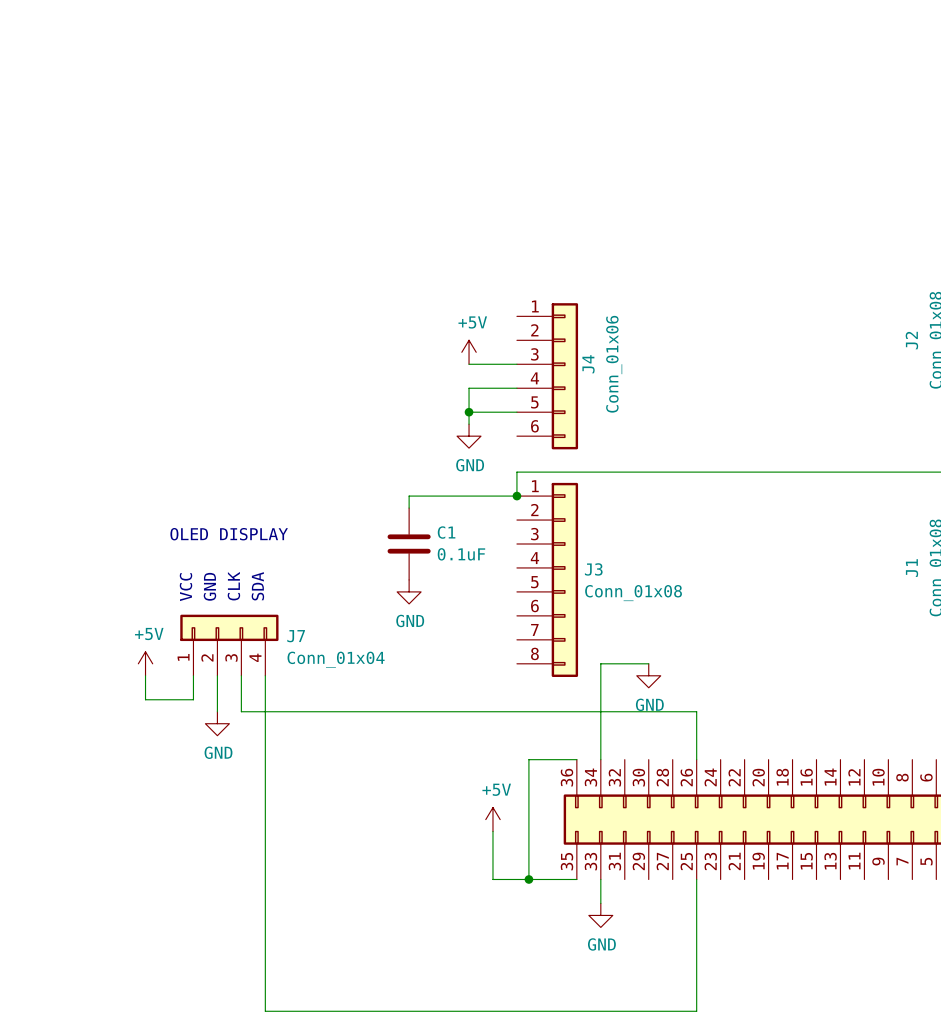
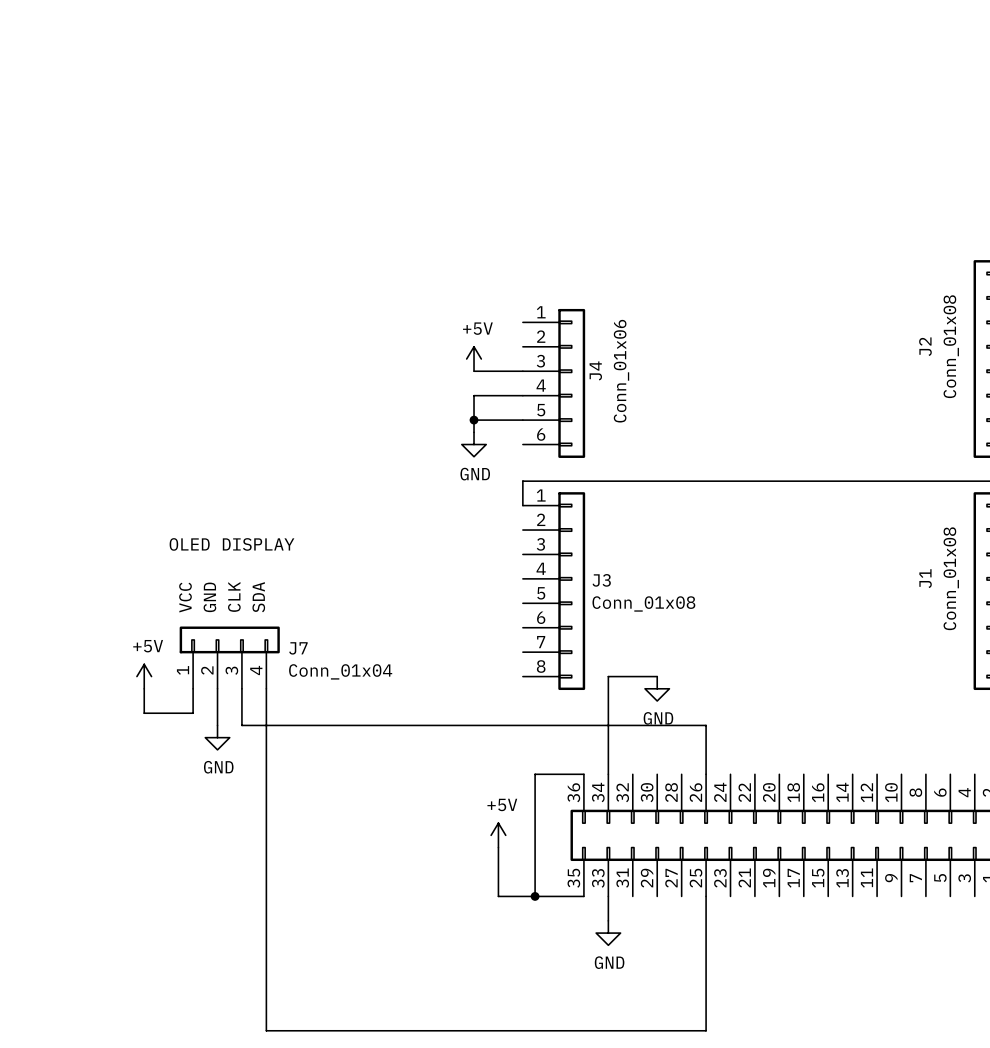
wire: (516, 496) (409, 496) (409, 508) -> none
junction: (516, 496) -> none
C1: 0.1uF (409, 544) -> none
power symbol: GND (409, 591) -> none

